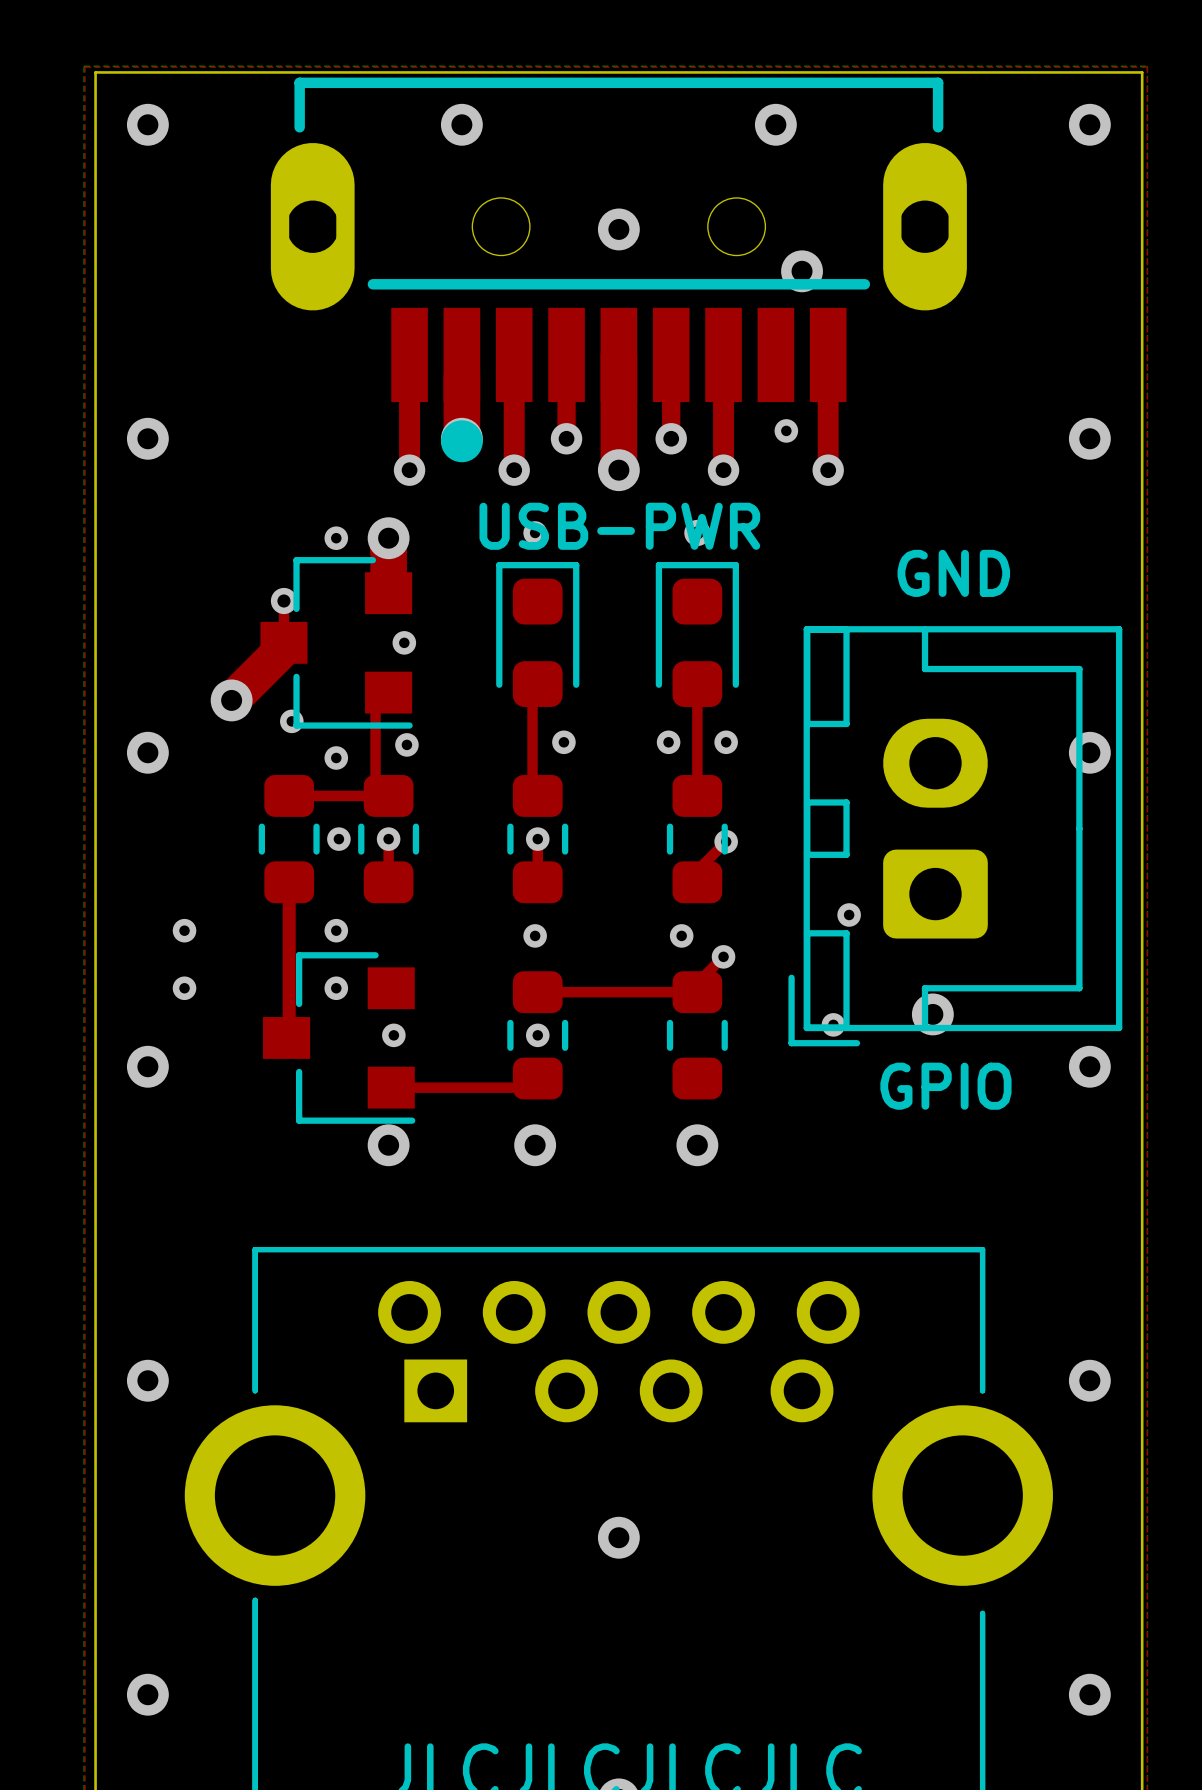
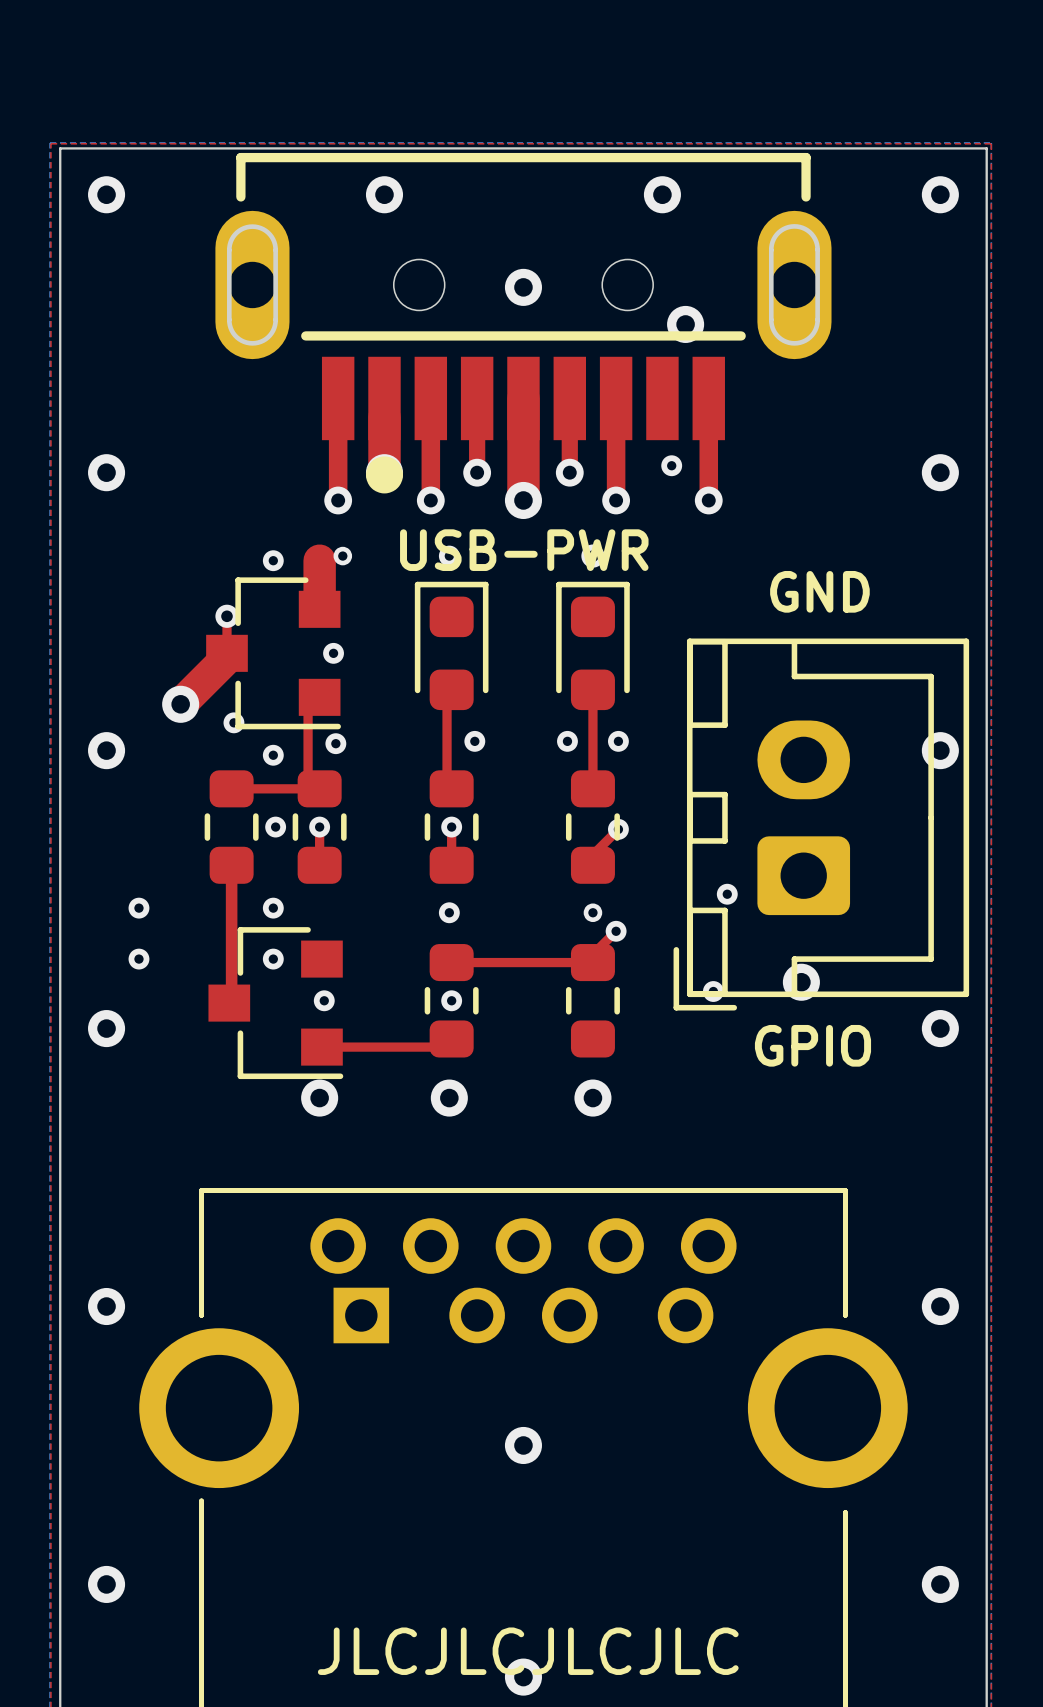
via size: [367, 517, 410, 560] -> [333, 546, 353, 566]
via position: (681, 935) -> (592, 912)

